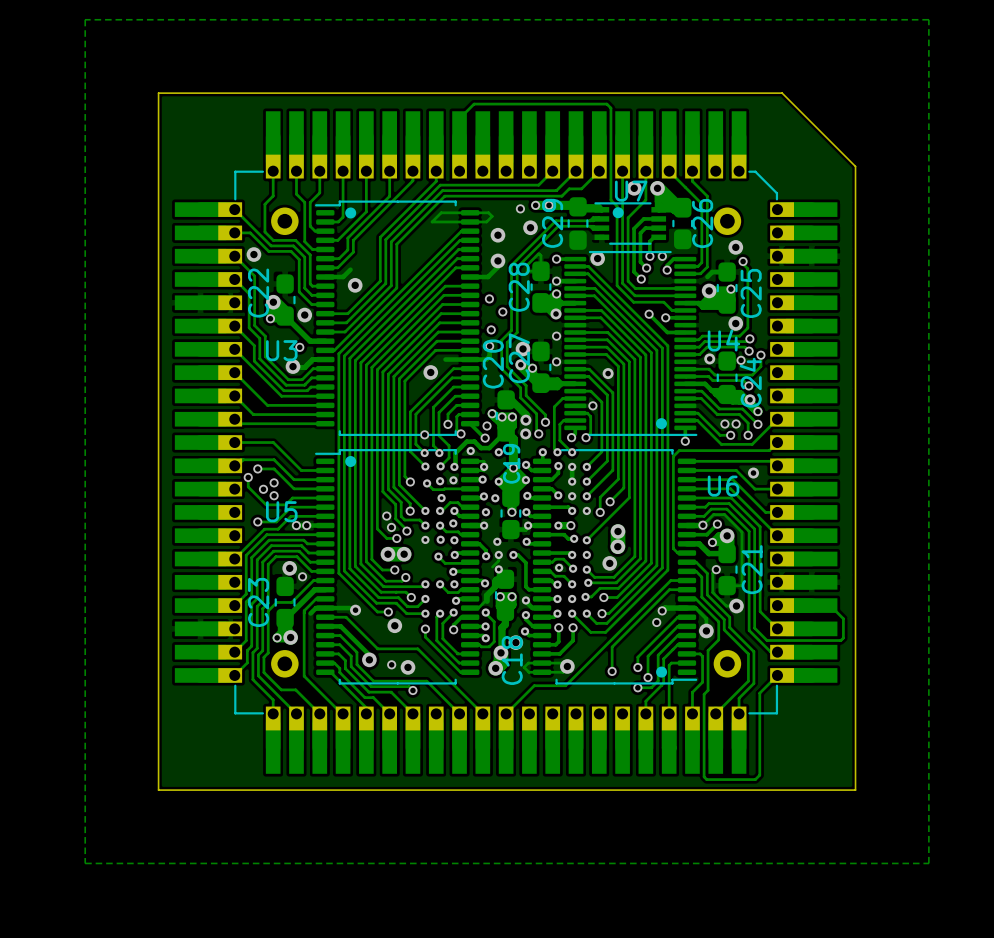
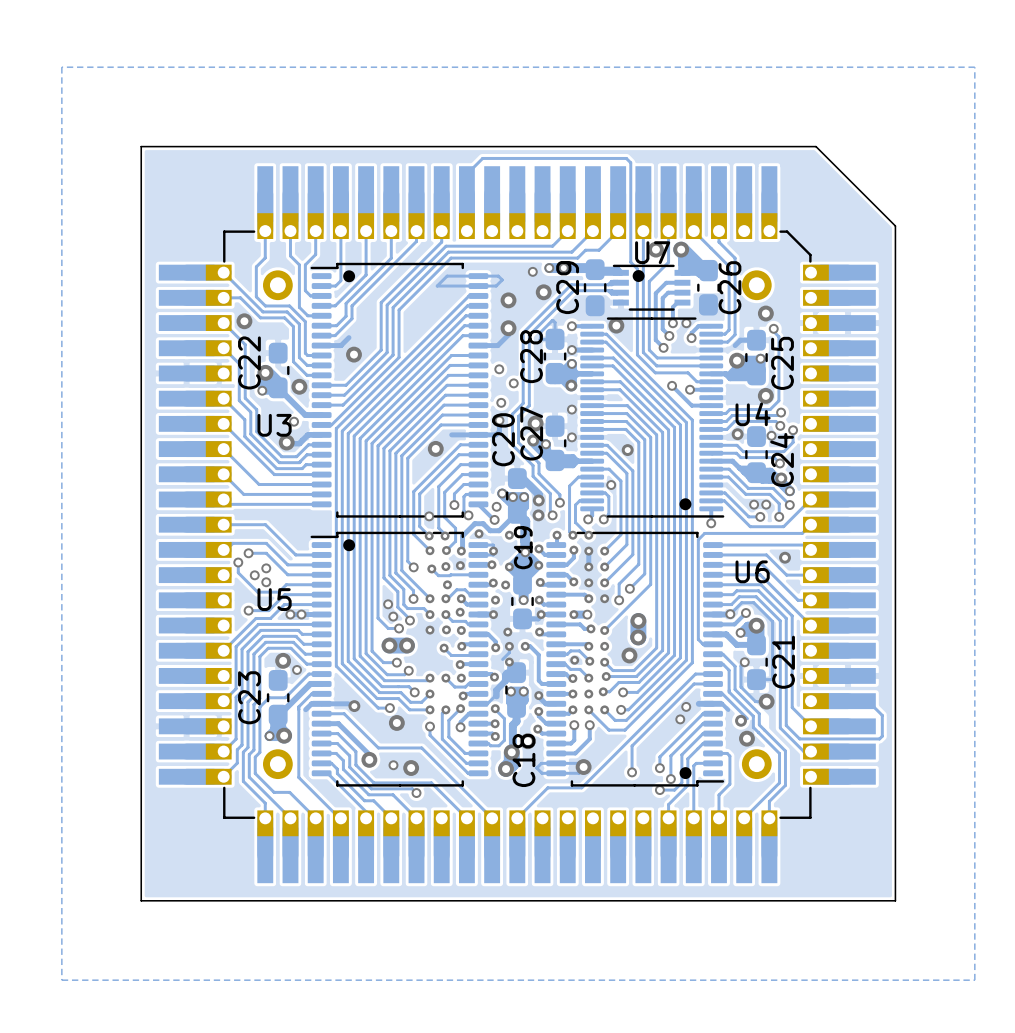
track: (673, 608) (665, 608) (662, 610) -> none
track: (695, 608) (706, 618) (706, 634) (706, 618) -> (722, 703) (728, 709)
track: (718, 621) (718, 639) (708, 650) (708, 690) (704, 694) (704, 776) (706, 779) (755, 779) (759, 775) (759, 693) (777, 675) -> none
via: none -> (741, 720)
via position: (706, 630) -> (746, 738)

